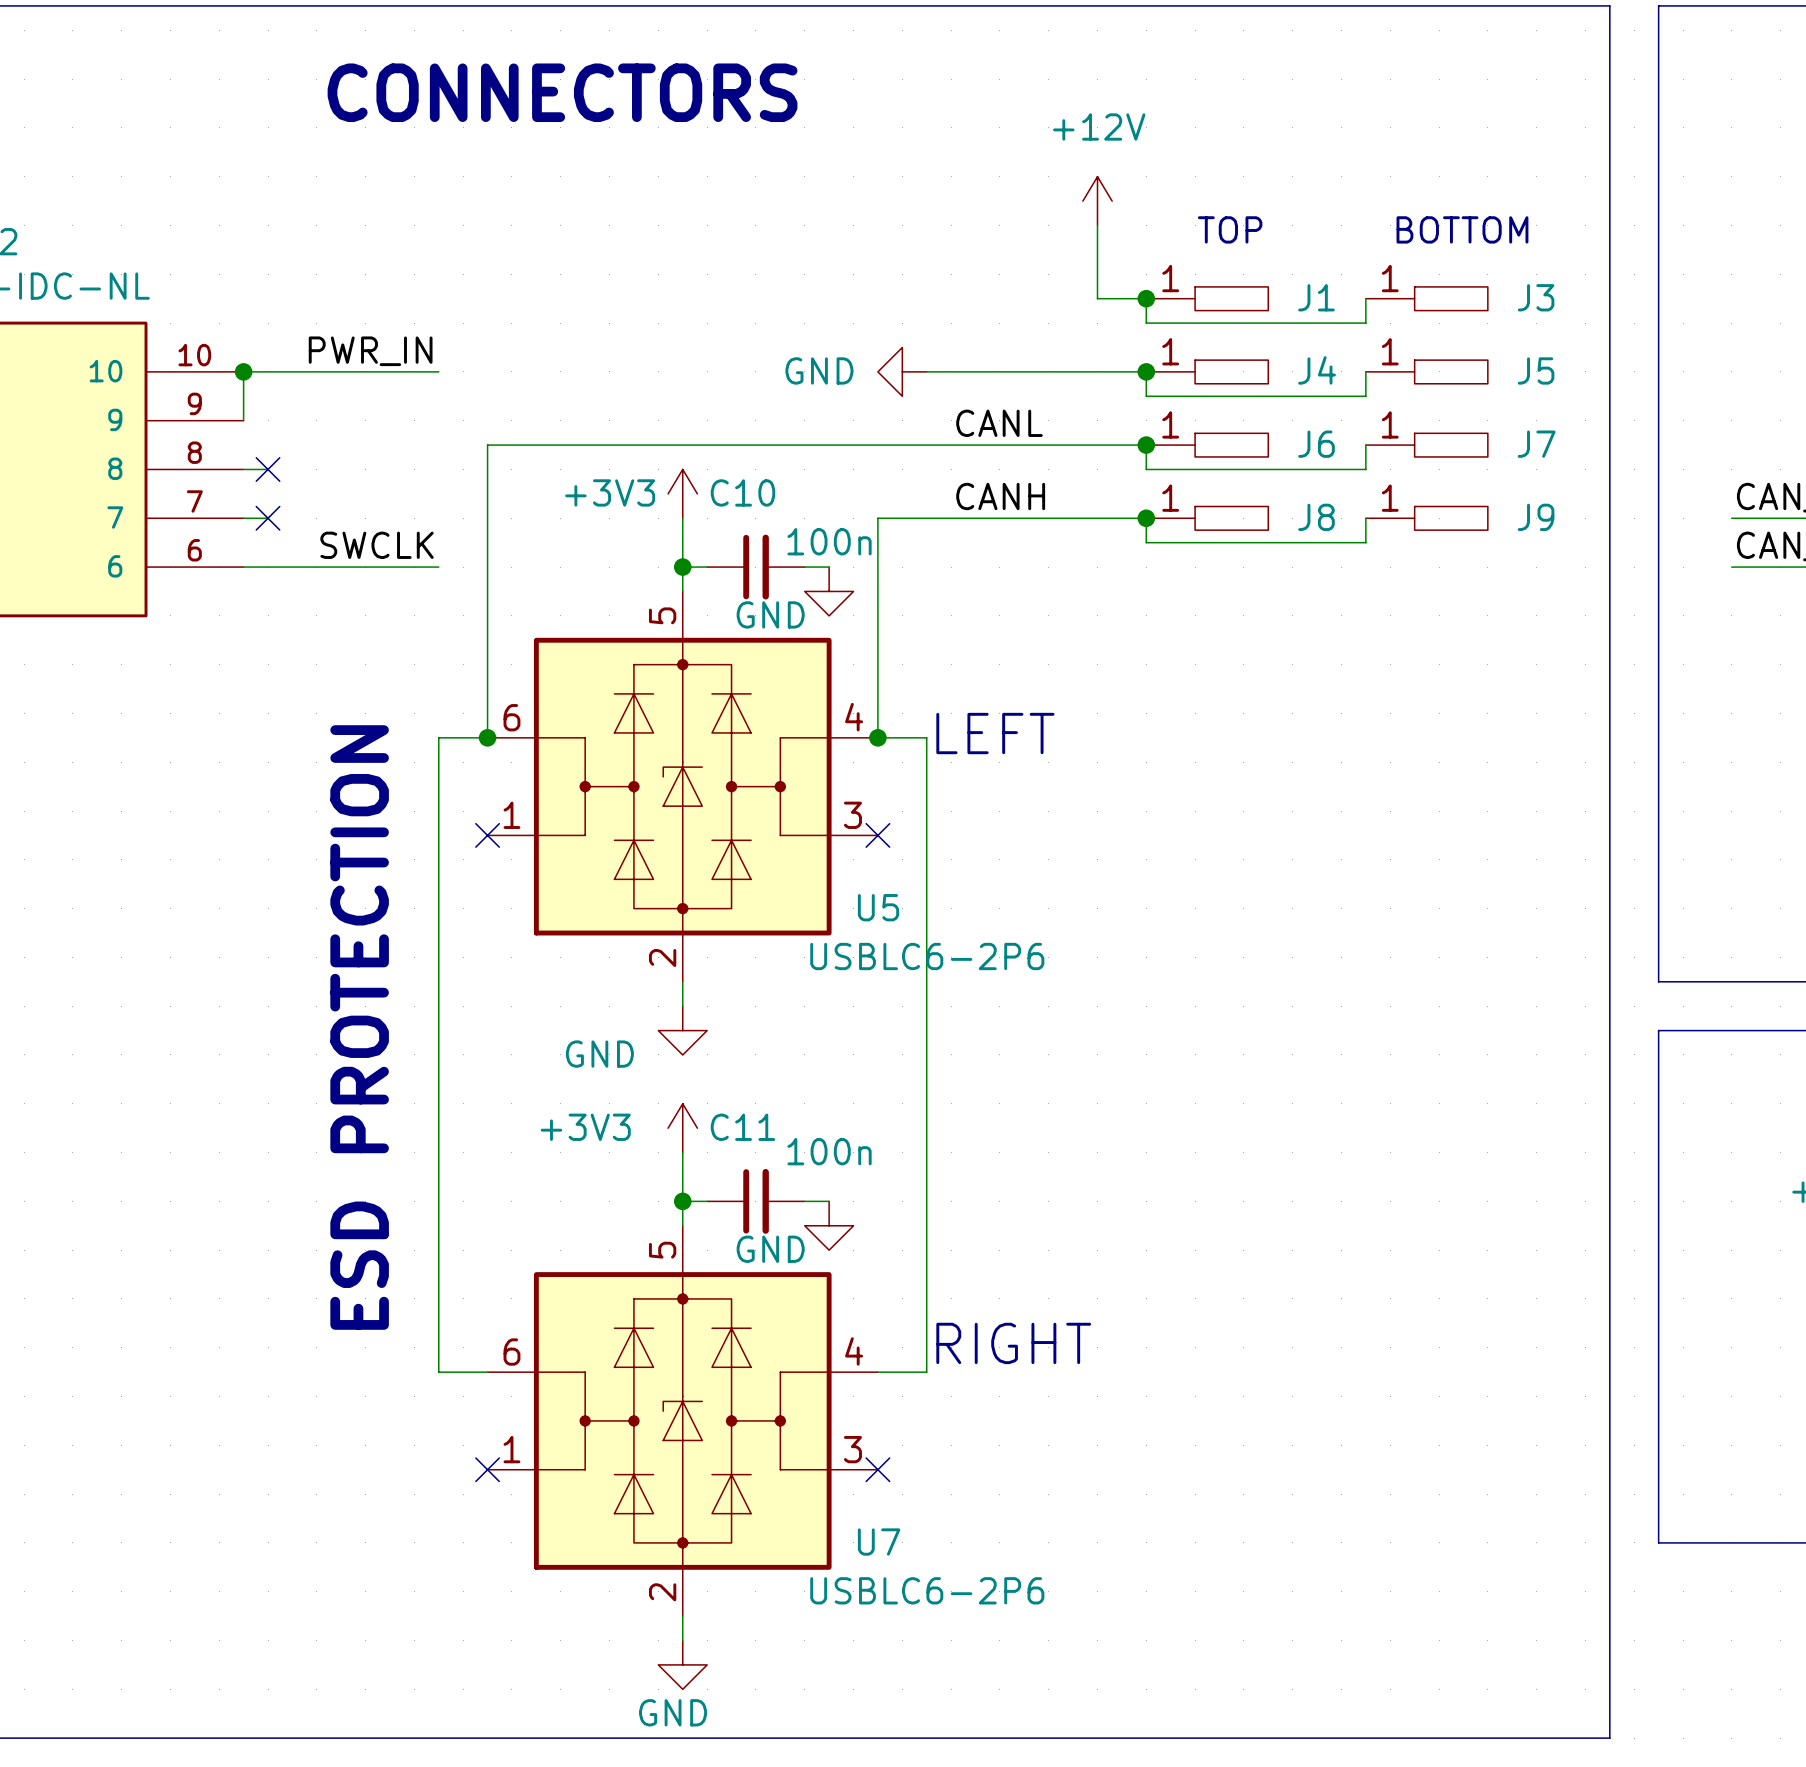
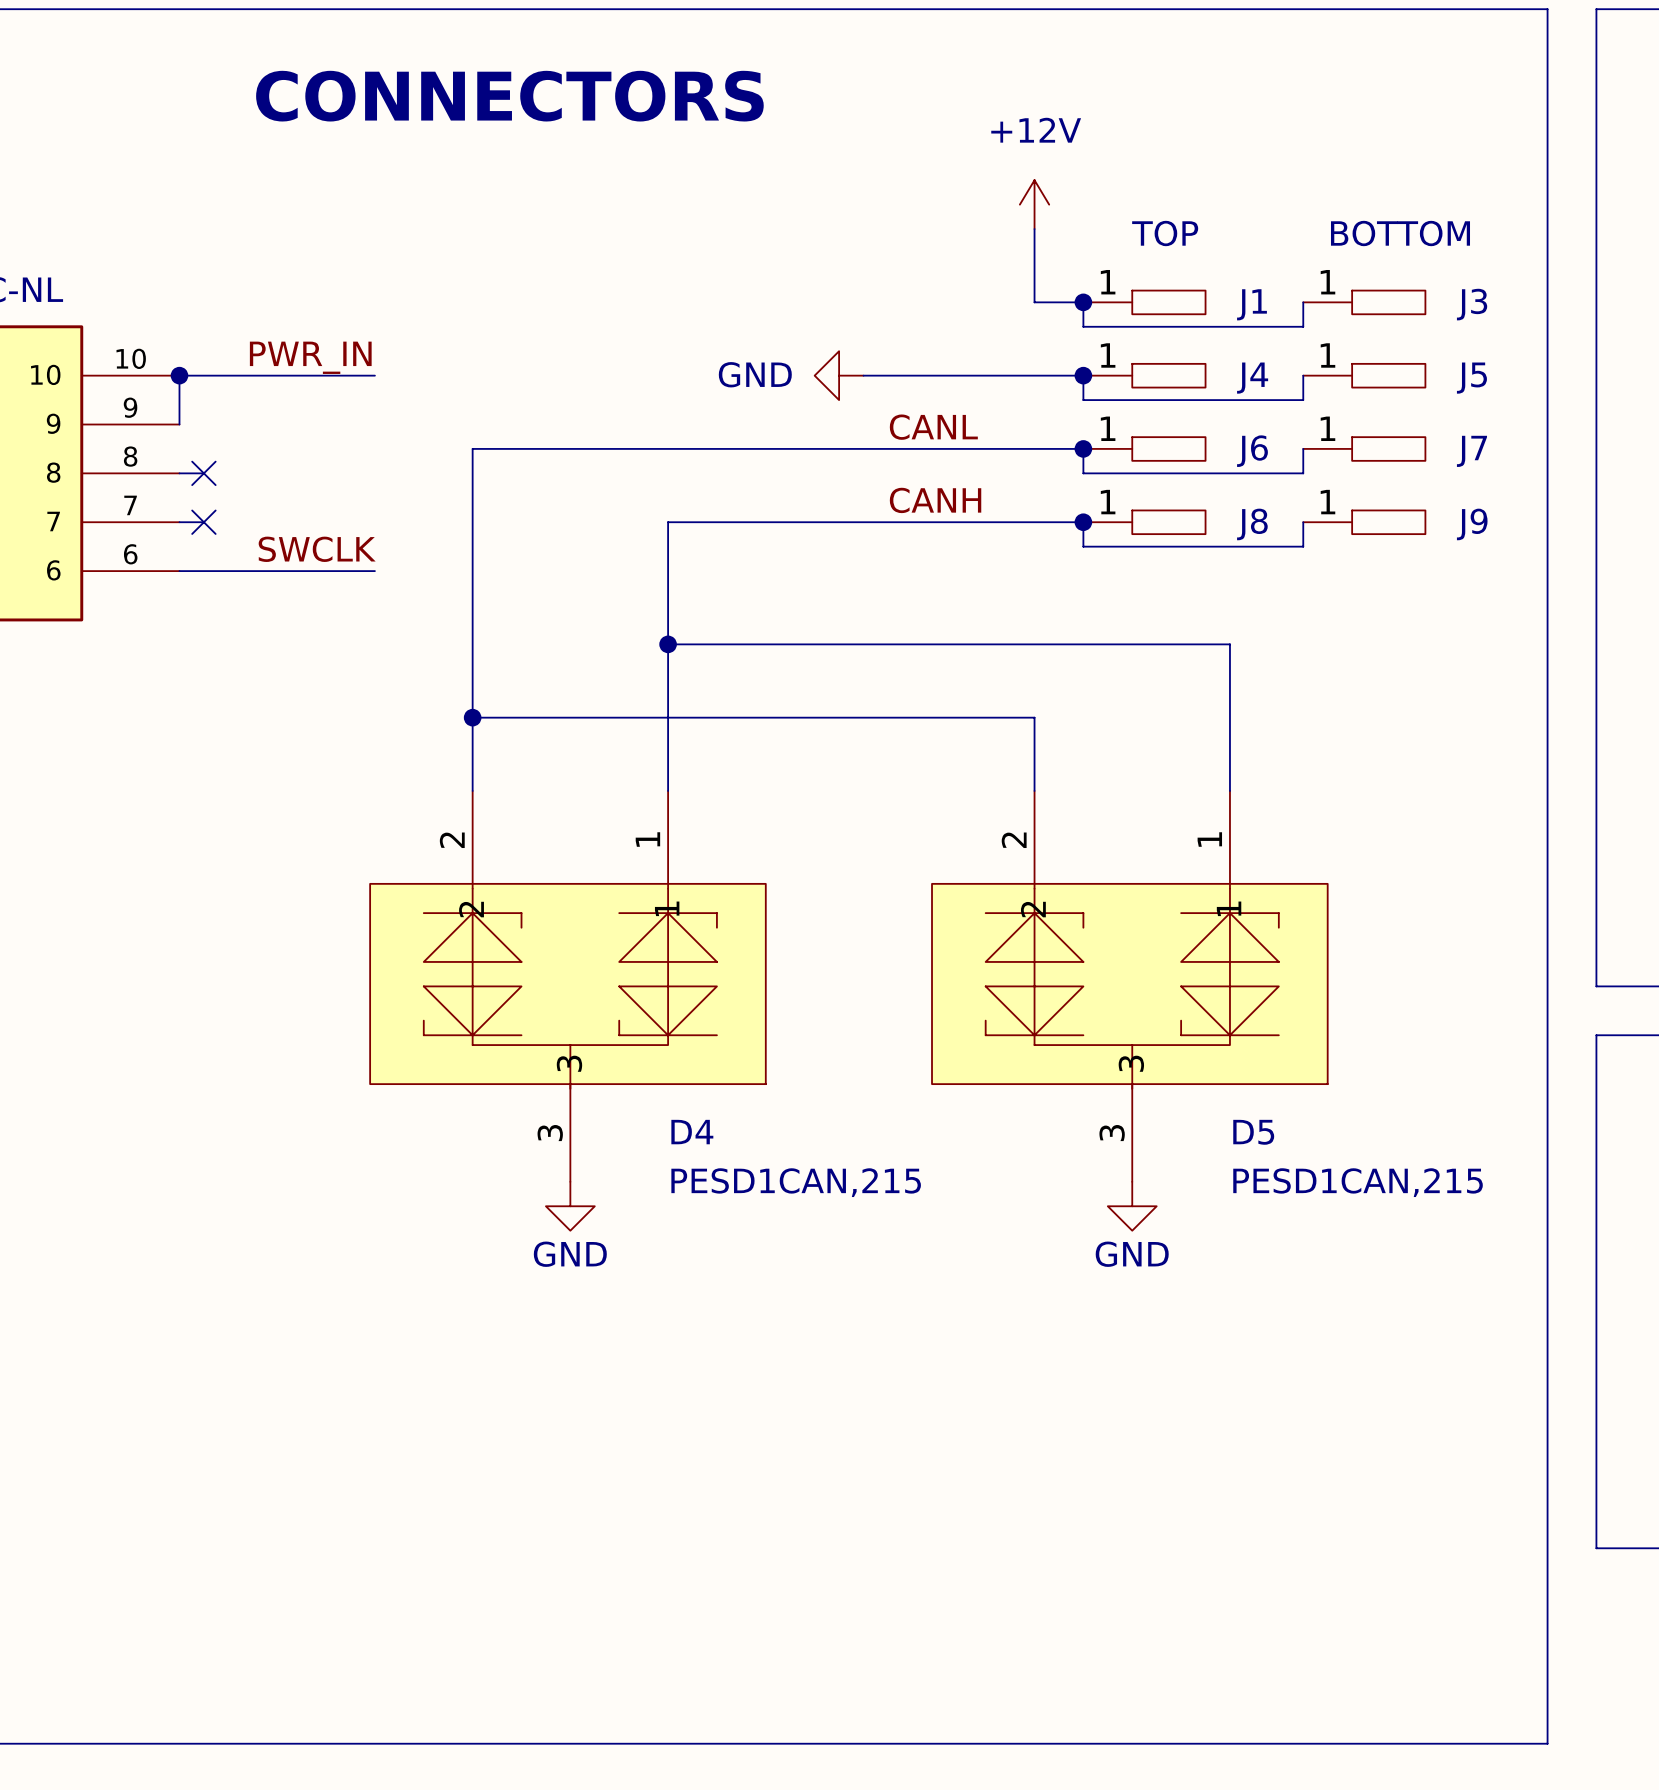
wire: (536, 445) (487, 445) (487, 737) (438, 737) (438, 1372) (487, 1372) -> (472, 448) (472, 790)
power symbol: +3V3 (682, 493) -> none
wire: (682, 518) (682, 591) -> none
wire: (877, 518) (877, 737) (926, 737) (926, 1372) (877, 1372) -> (814, 522) (668, 522) (668, 790)
wire: (682, 567) (707, 567) -> none
junction: (682, 567) -> none
C10: 100n (755, 567) -> none
wire: (804, 567) (829, 567) -> none
power symbol: GND (829, 591) -> none
wire: none -> (668, 644) (1229, 644) (1229, 790)
junction: none -> (668, 644)
wire: none -> (472, 717) (1034, 717) (1034, 790)
text: LEFT (995, 733) -> none
junction position: (487, 737) -> (472, 717)
junction: (877, 737) -> none
U5: USBLC6-2P6 (682, 786) -> none
no-connect mark: (487, 835) -> none
no-connect mark: (877, 835) -> none
D4: none -> PESD1CAN,215 (567, 986)
D5: none -> PESD1CAN,215 (1129, 986)
text: ESD PROTECTION (359, 1027) -> none
power symbol: GND (682, 1030) -> none
power symbol: +3V3 (682, 1128) -> none
wire: (682, 1152) (682, 1225) -> none
power symbol: none -> GND (570, 1206)
wire: (682, 1201) (707, 1201) -> none
junction: (682, 1201) -> none
C11: 100n (755, 1201) -> none
wire: (804, 1201) (829, 1201) -> none
power symbol: none -> GND (1132, 1206)
power symbol: GND (829, 1225) -> none
text: RIGHT (1013, 1343) -> none
U7: USBLC6-2P6 (682, 1420) -> none
no-connect mark: (487, 1469) -> none
no-connect mark: (877, 1469) -> none
wire: (682, 1616) (682, 1640) -> none
power symbol: GND (682, 1664) -> none

